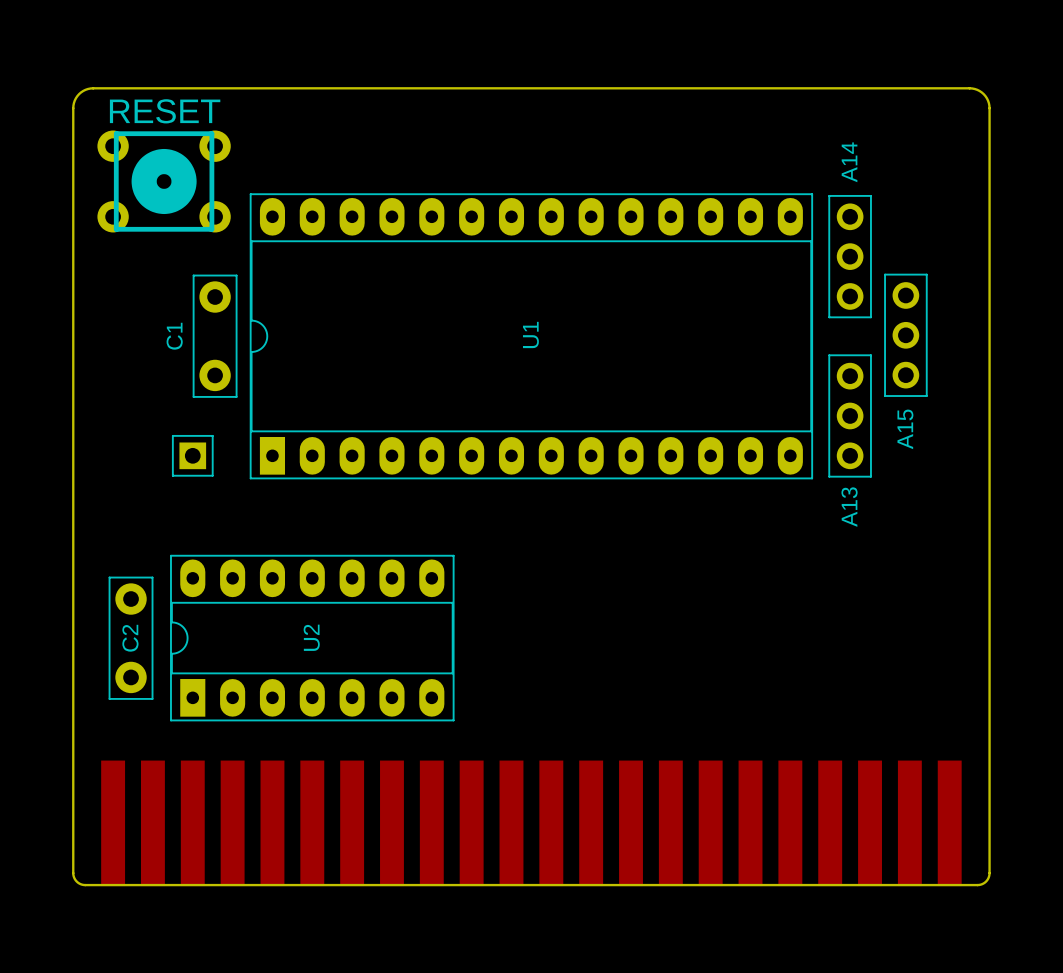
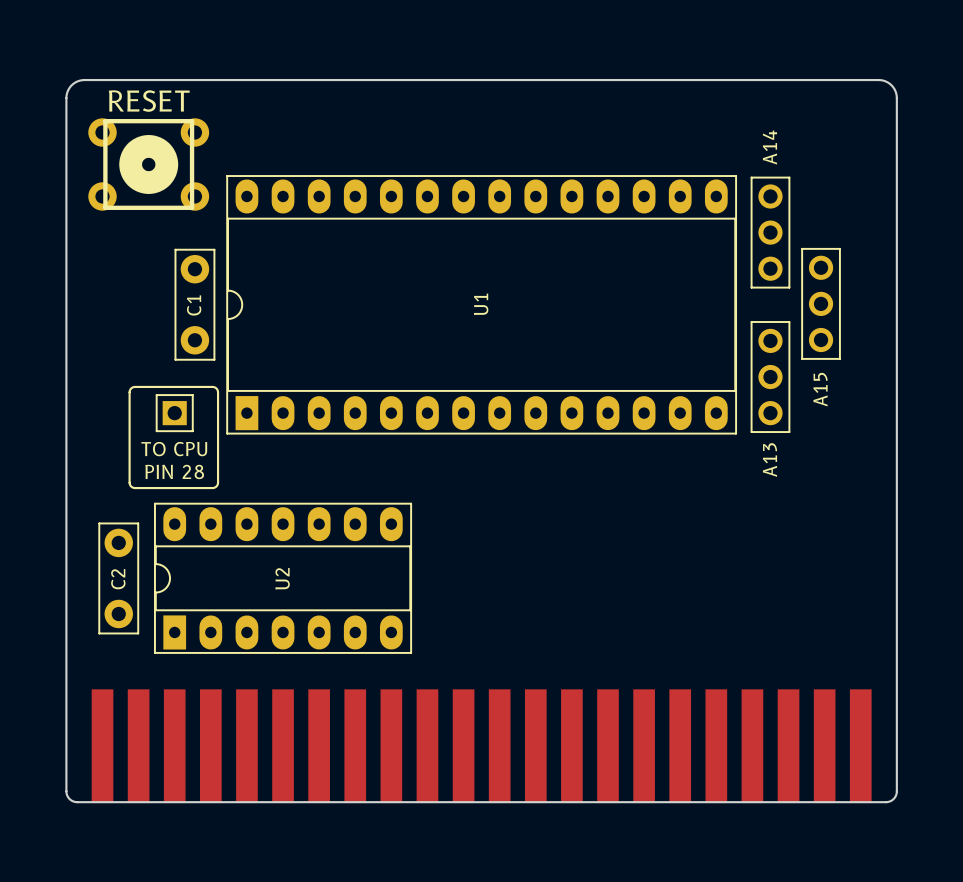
C1 name position: C1 (174, 336) -> C1 (194, 305)
line: none -> (135, 386) (212, 386) (216, 389) (218, 482) (215, 486) (135, 488) (130, 485) (129, 392) (131, 388) (135, 386)
text: none -> TO CPU (174, 449)
text: none -> PIN 28 (174, 471)

